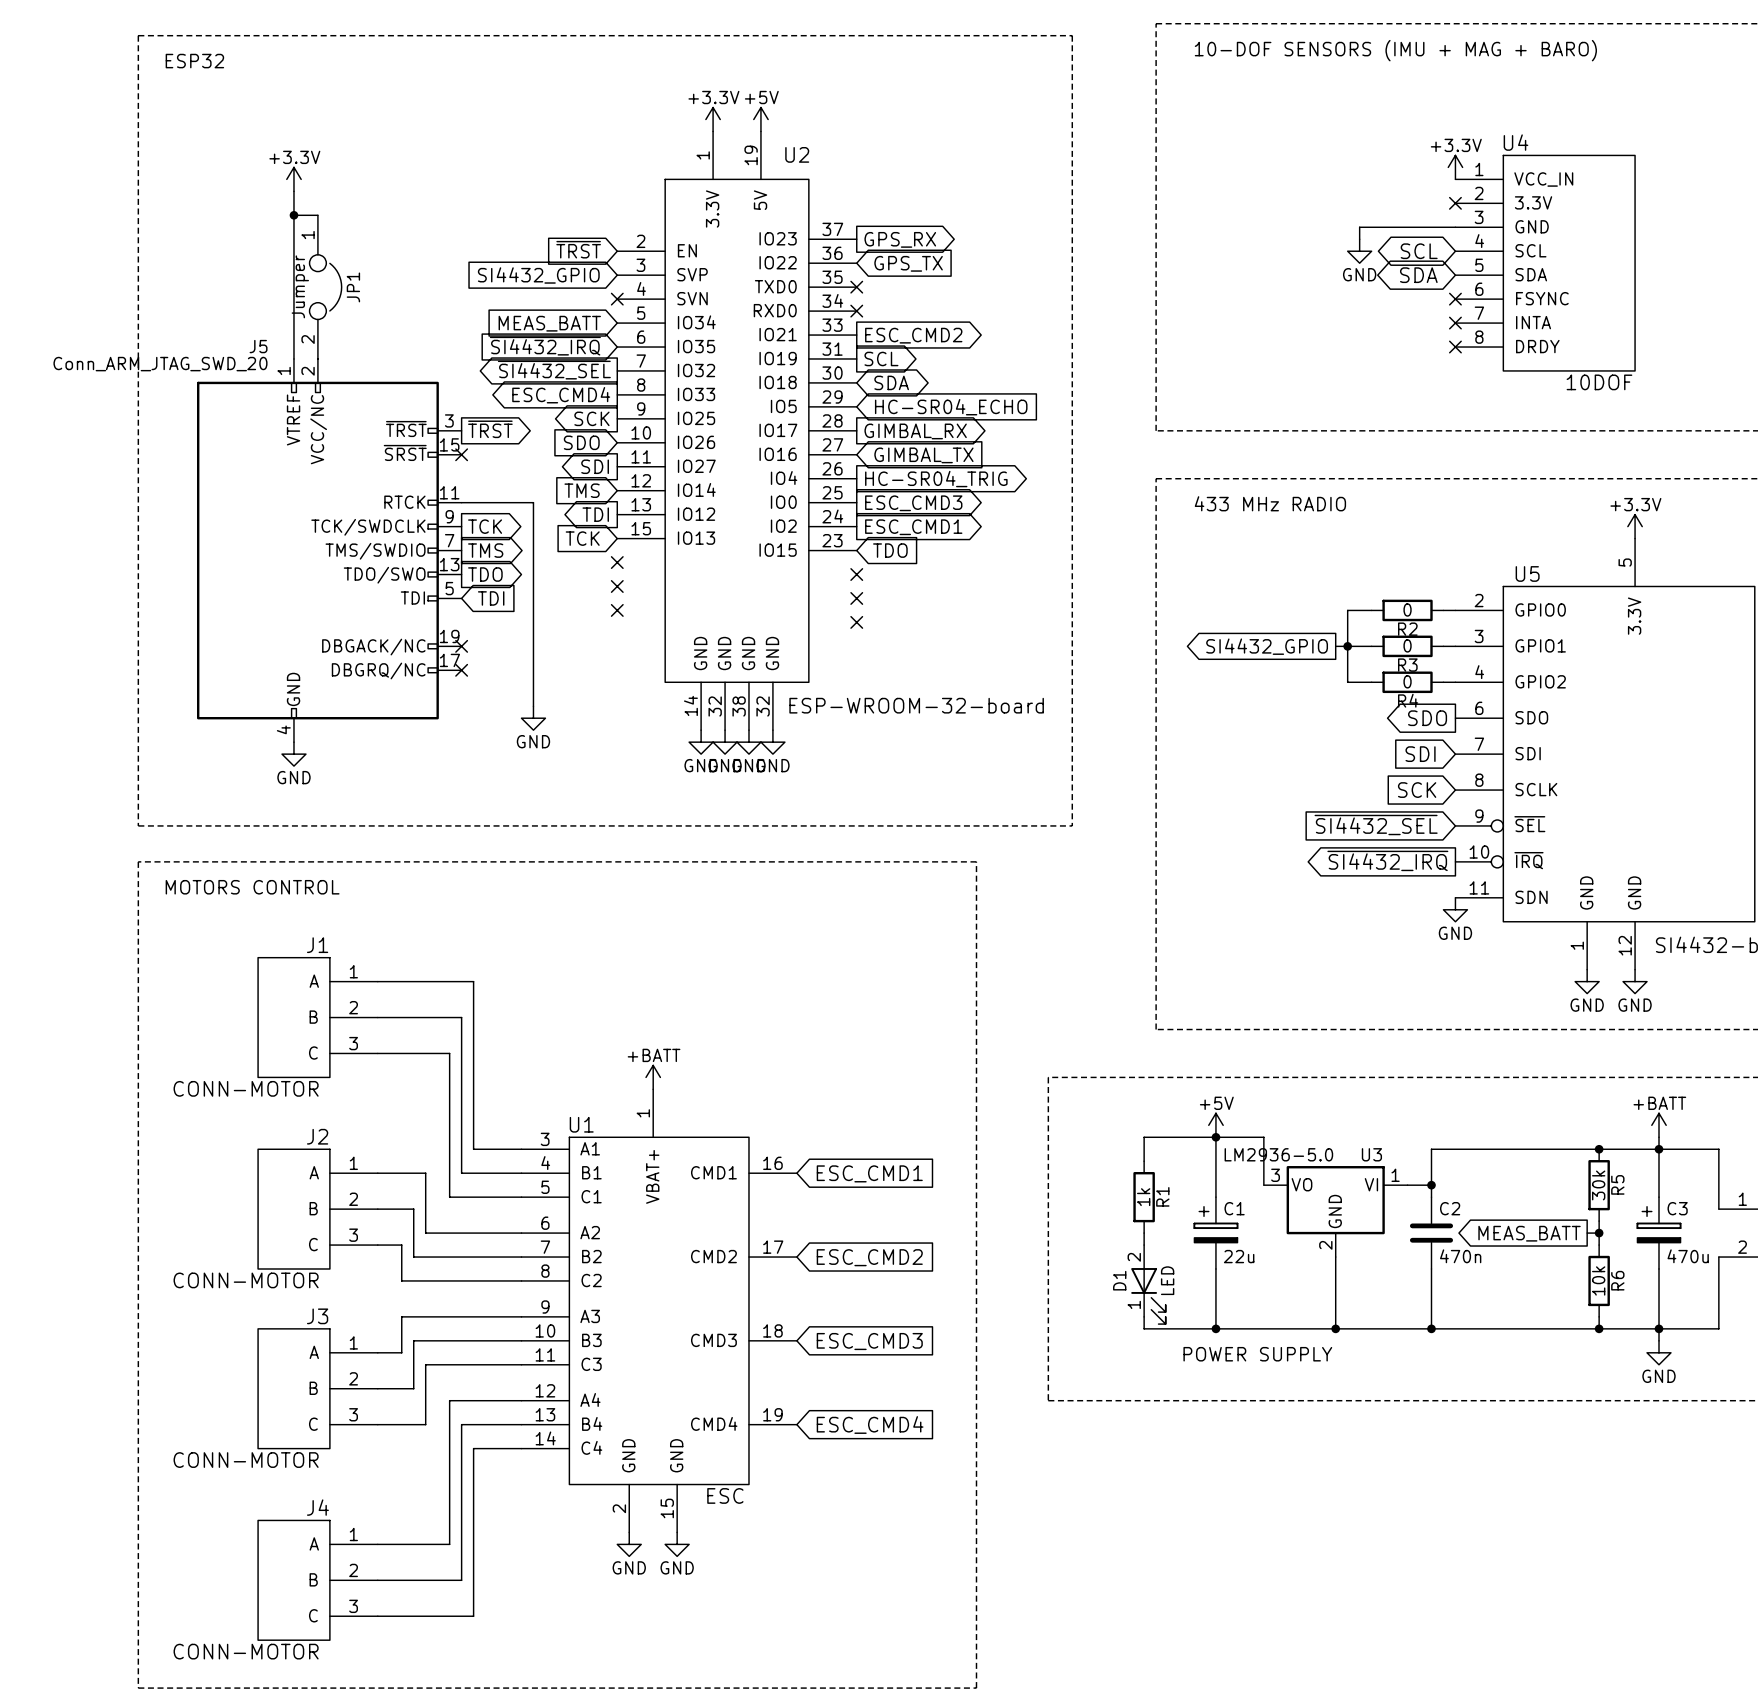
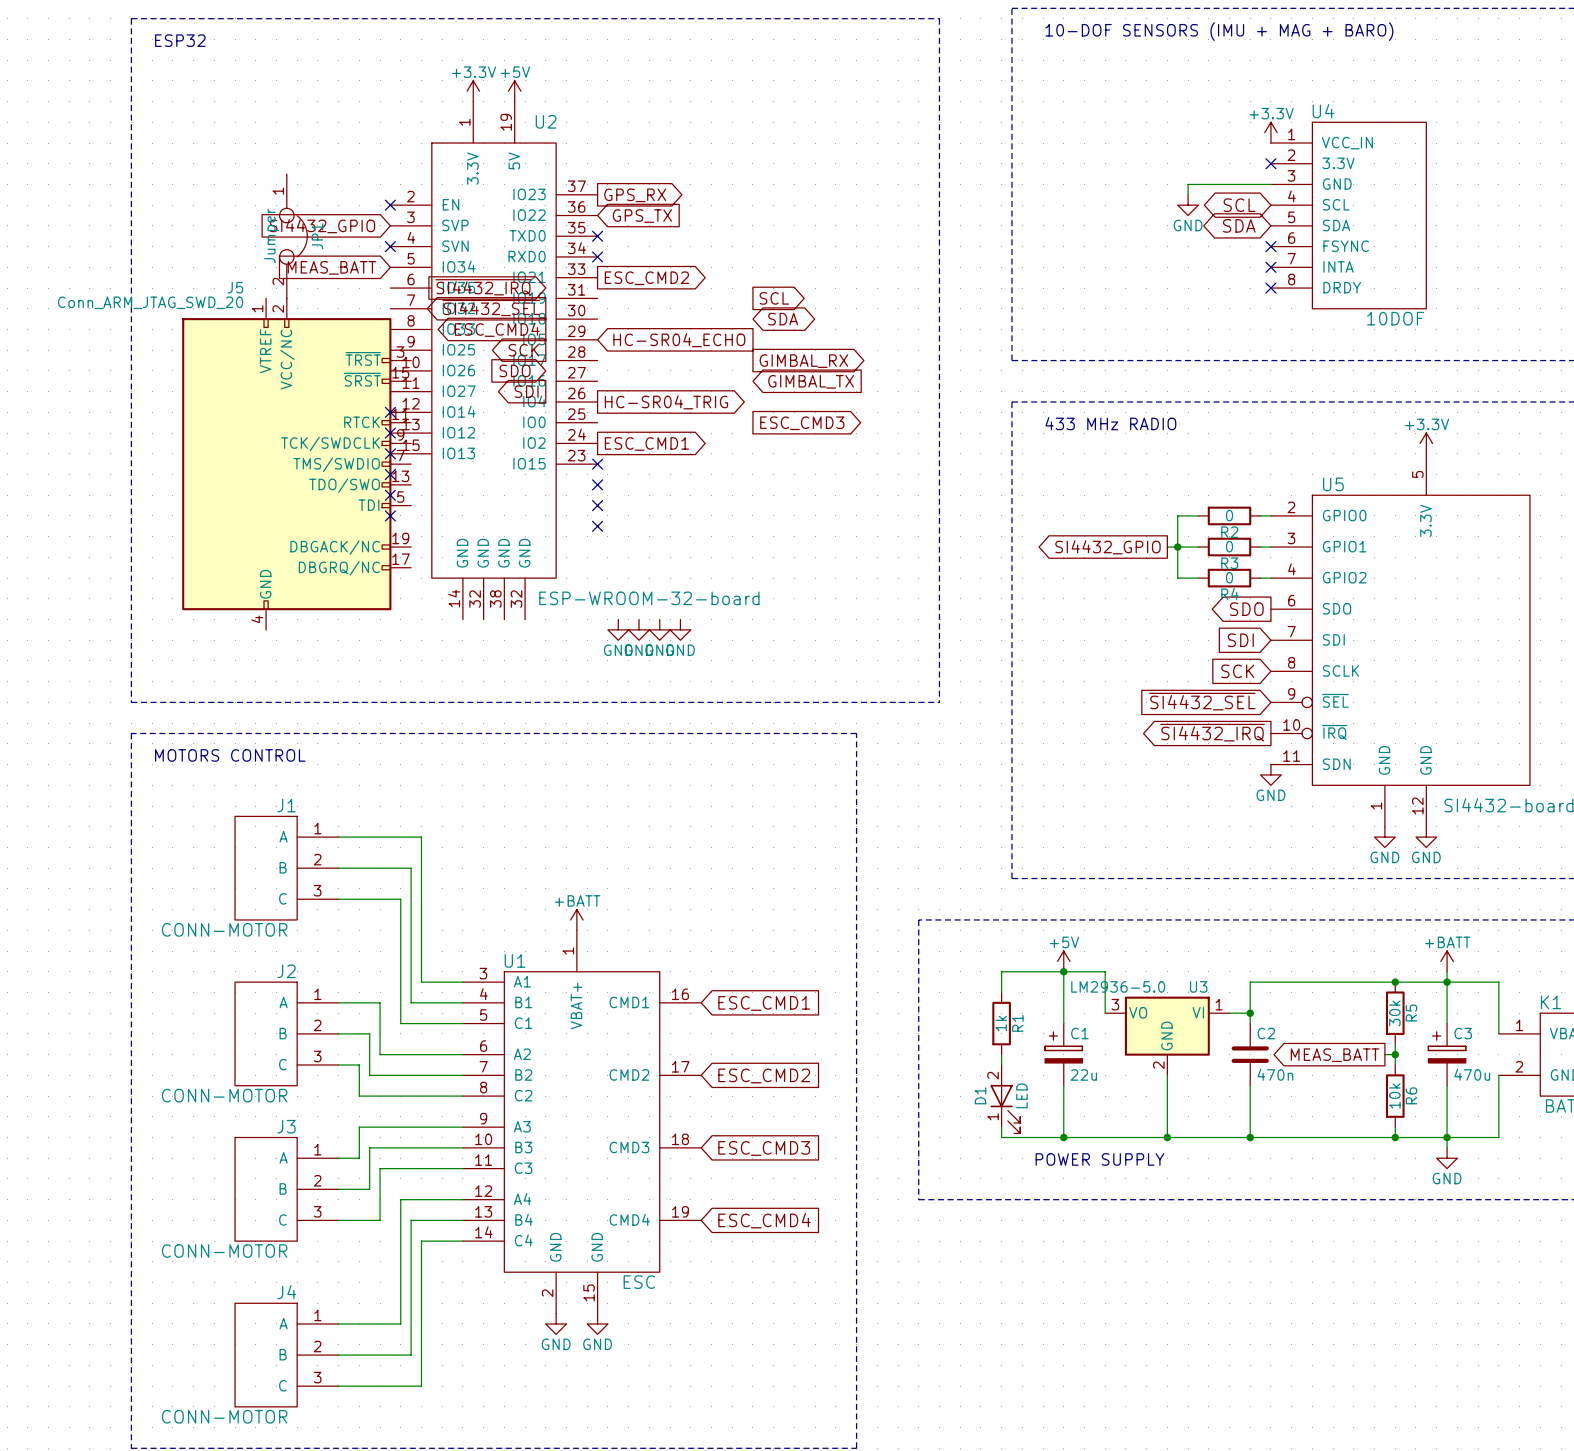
power symbol: none -> +3.3V (473, 91)
power symbol: +3.3V (713, 119) -> none
power symbol position: +5V (760, 119) -> +5V (514, 91)
power symbol: +3.3V (293, 179) -> none
wire: (293, 191) (293, 358) -> none
wire: (293, 215) (317, 215) -> none
junction: (293, 215) -> none
global label position: GPS_RX (900, 239) -> GPS_RX (635, 195)
global label: ~{TRST} (578, 249) -> none
no-connect mark: none -> (390, 205)
global label position: GPS_TX (908, 263) -> GPS_TX (642, 216)
global label position: SI4432_GPIO (538, 275) -> SI4432_GPIO (322, 226)
no-connect mark: none -> (597, 236)
no-connect mark: (856, 287) -> none
no-connect mark: none -> (390, 246)
no-connect mark: (617, 299) -> none
no-connect mark: none -> (597, 256)
no-connect mark: (856, 311) -> none
global label position: MEAS_BATT (549, 323) -> MEAS_BATT (331, 267)
global label position: ESC_CMD2 (913, 335) -> ESC_CMD2 (646, 278)
global label position: HC-SR04_ECHO (951, 407) -> HC-SR04_ECHO (679, 340)
global label: ~{TRST} (490, 429) -> none
U2 position: (737, 430) -> (493, 360)
no-connect mark: (461, 454) -> none
global label position: HC-SR04_TRIG (936, 479) -> HC-SR04_TRIG (666, 402)
no-connect mark: none -> (390, 412)
global label: TMS (582, 490) -> none
wire: (461, 502) (533, 502) (533, 706) -> none
no-connect mark: none -> (390, 433)
global label: TDI (595, 514) -> none
global label: TCK (485, 526) -> none
global label position: ESC_CMD1 (913, 527) -> ESC_CMD1 (646, 443)
no-connect mark: none -> (390, 453)
global label: TCK (582, 538) -> none
global label: TMS (485, 550) -> none
no-connect mark: none -> (597, 464)
global label: TDO (890, 550) -> none
no-connect mark: none -> (390, 474)
no-connect mark: (617, 562) -> none
global label: TDO (485, 574) -> none
no-connect mark: none -> (597, 484)
no-connect mark: (856, 574) -> none
no-connect mark: none -> (390, 495)
no-connect mark: (617, 586) -> none
global label: TDI (491, 598) -> none
no-connect mark: none -> (597, 505)
no-connect mark: (856, 598) -> none
no-connect mark: none -> (390, 515)
no-connect mark: (617, 610) -> none
no-connect mark: none -> (597, 526)
no-connect mark: (856, 622) -> none
no-connect mark: (461, 646) -> none
no-connect mark: (461, 670) -> none
power symbol: GND (533, 718) -> none
power symbol: GND (293, 754) -> none

